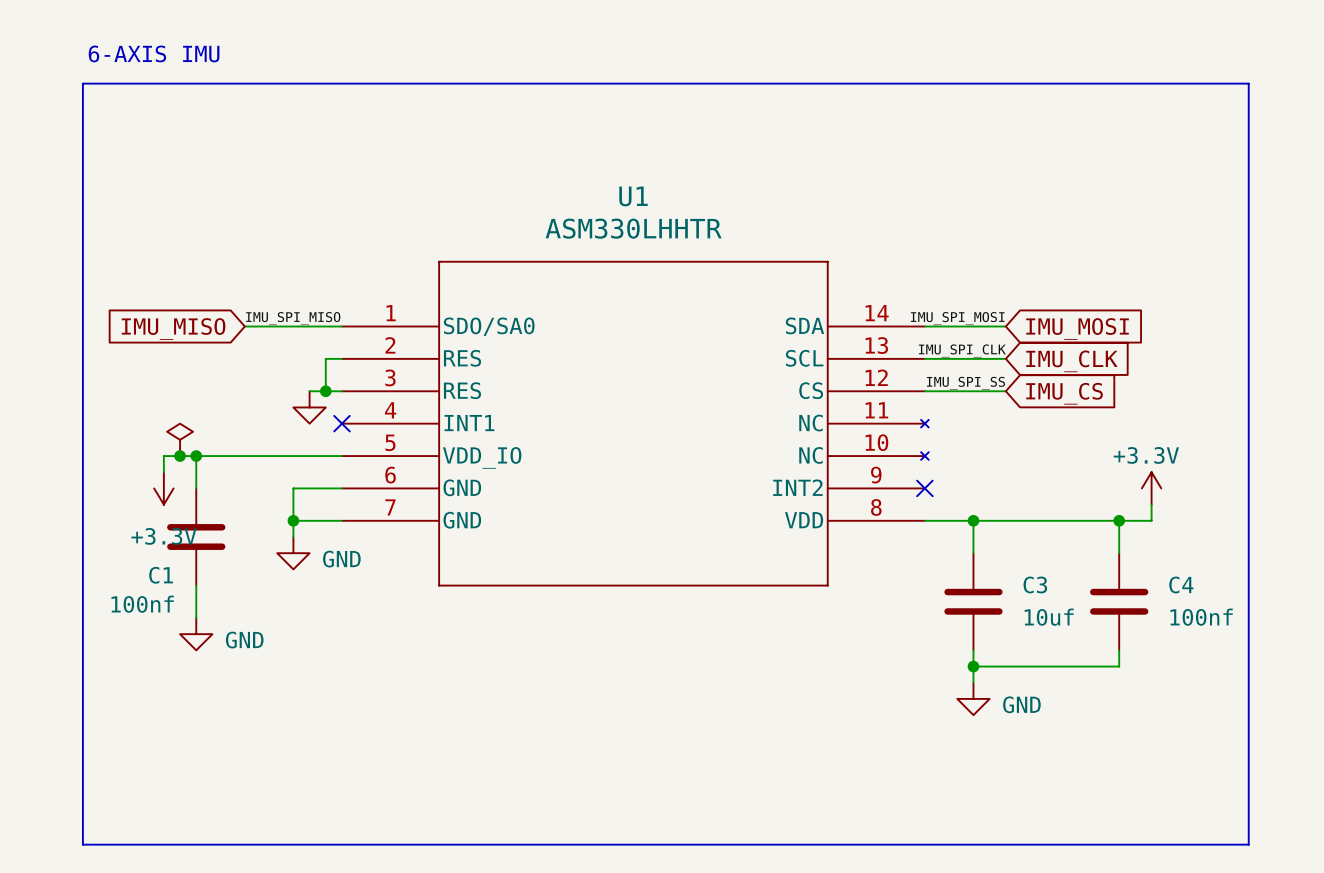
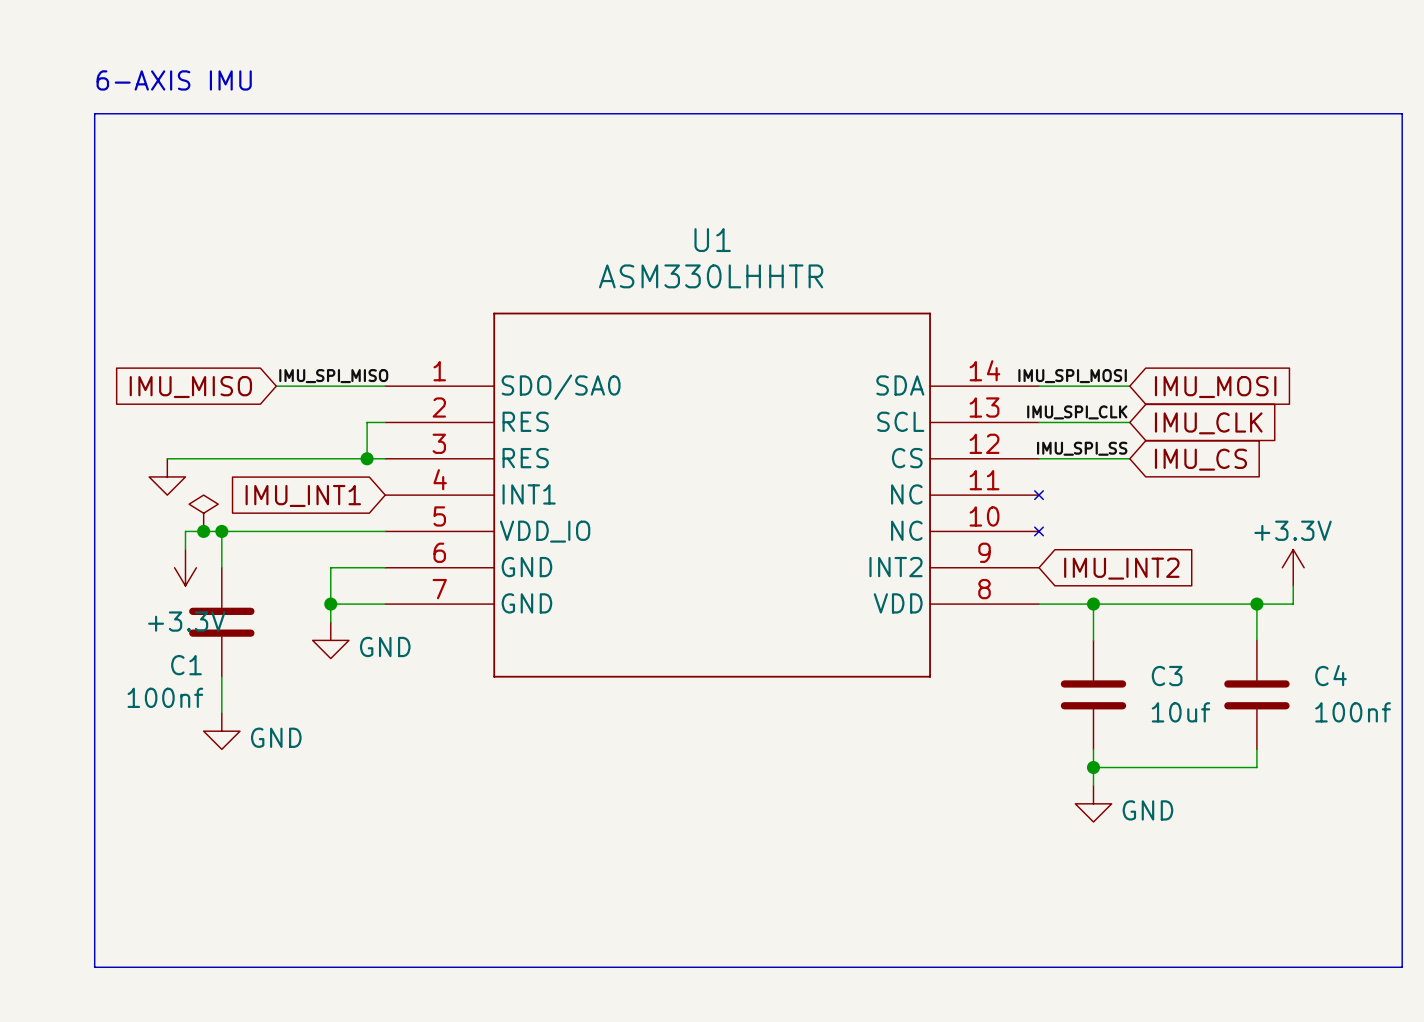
wire: none -> (167, 458) (348, 458)
power symbol position: (309, 407) -> (167, 476)
no-connect mark: (341, 423) -> none
global label: none -> IMU_INT1 (303, 495)
no-connect mark: (924, 488) -> none
global label: none -> IMU_INT2 (1121, 568)

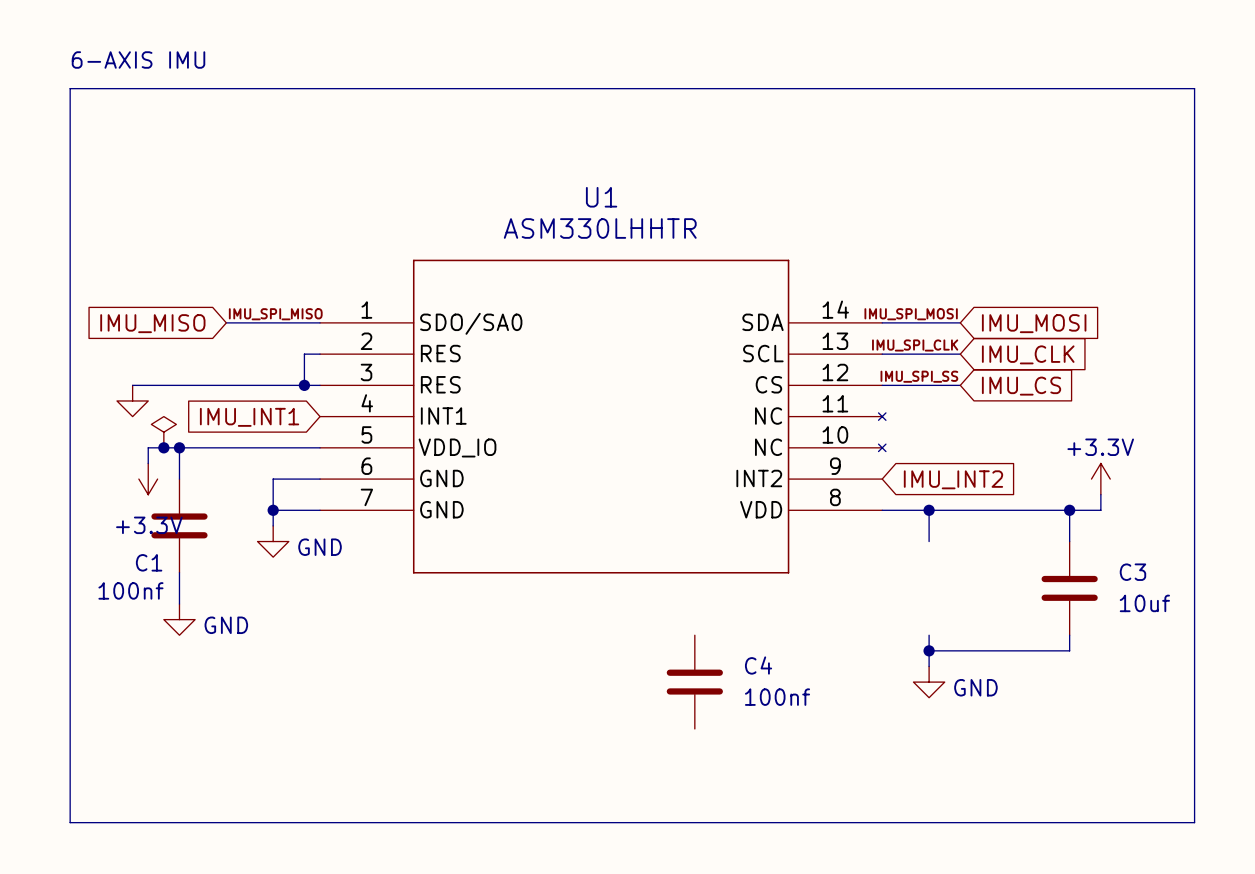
C4 name: C4 (1331, 675) -> C3 (1132, 572)
C3: 10uf (1093, 694) -> none
C4 value: 100nf (1353, 712) -> 10uf (1144, 603)
C4: none -> 100nf (694, 682)

